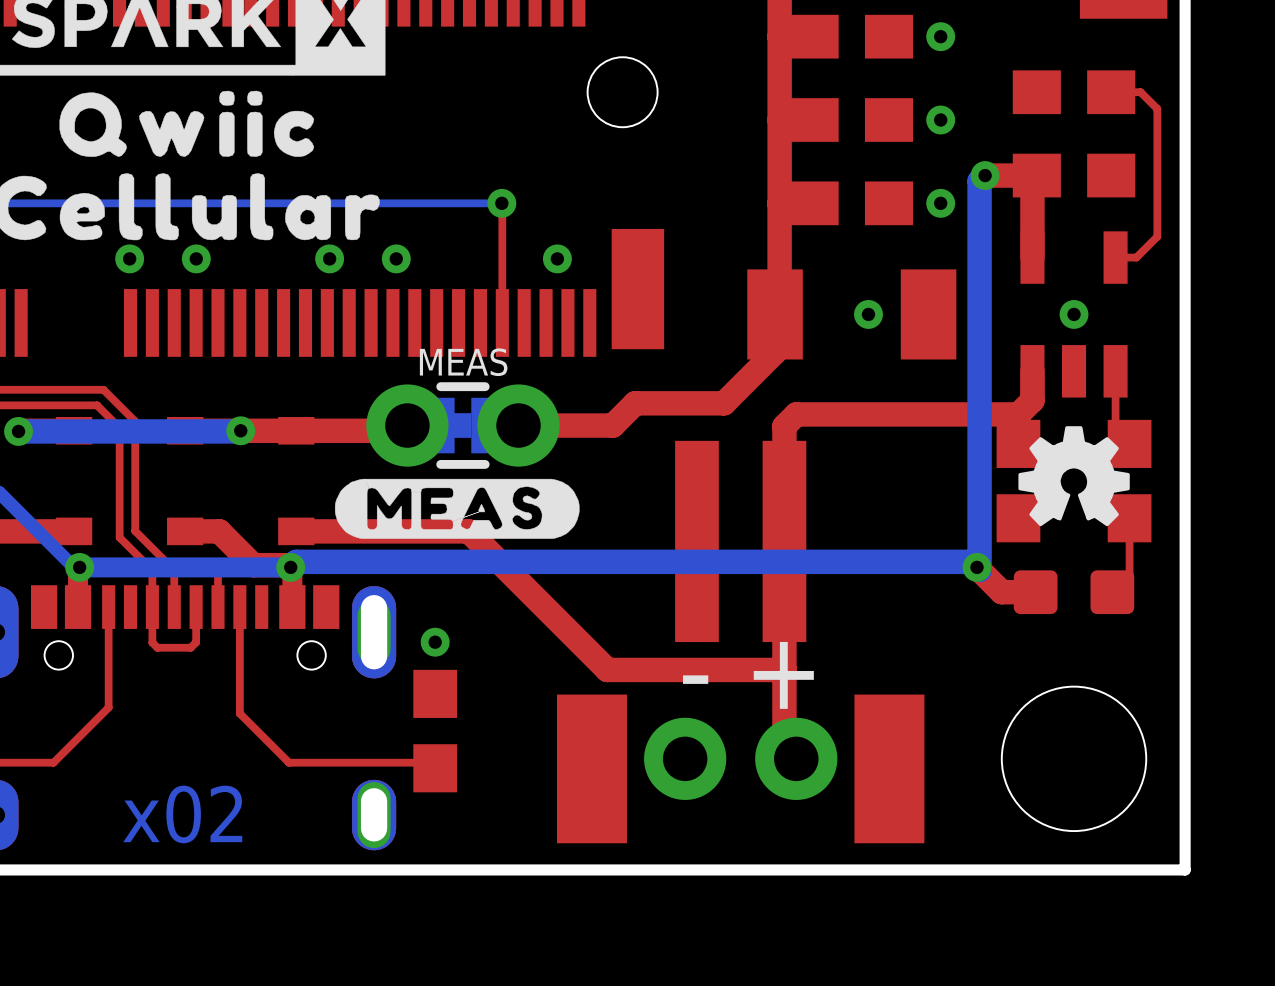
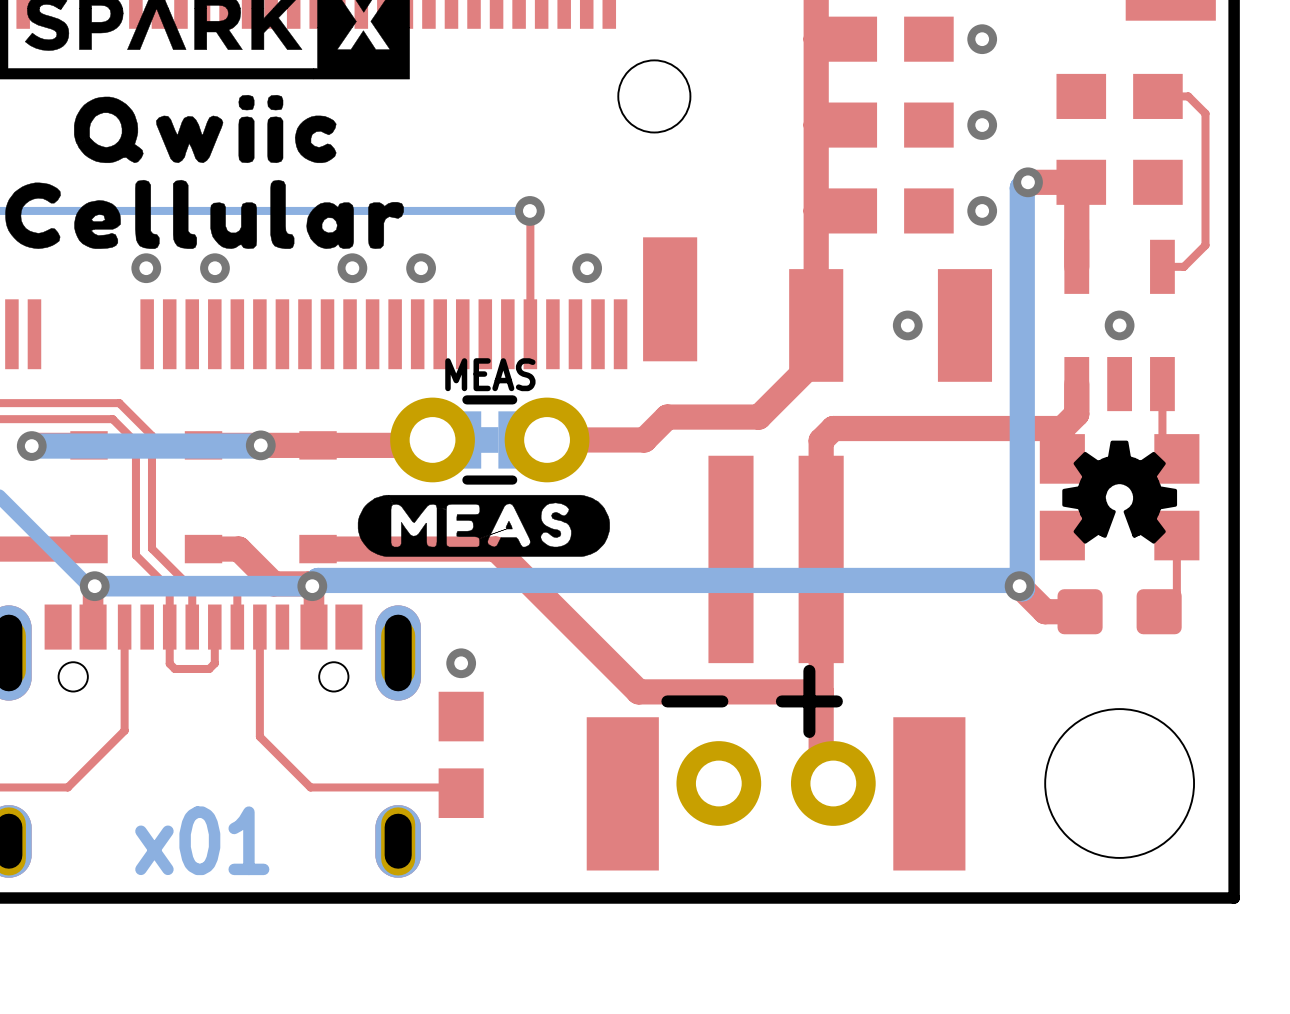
part footprint: [747, 269, 957, 360] -> [789, 269, 993, 382]
text: x02 (182, 814) -> x01 (202, 840)

